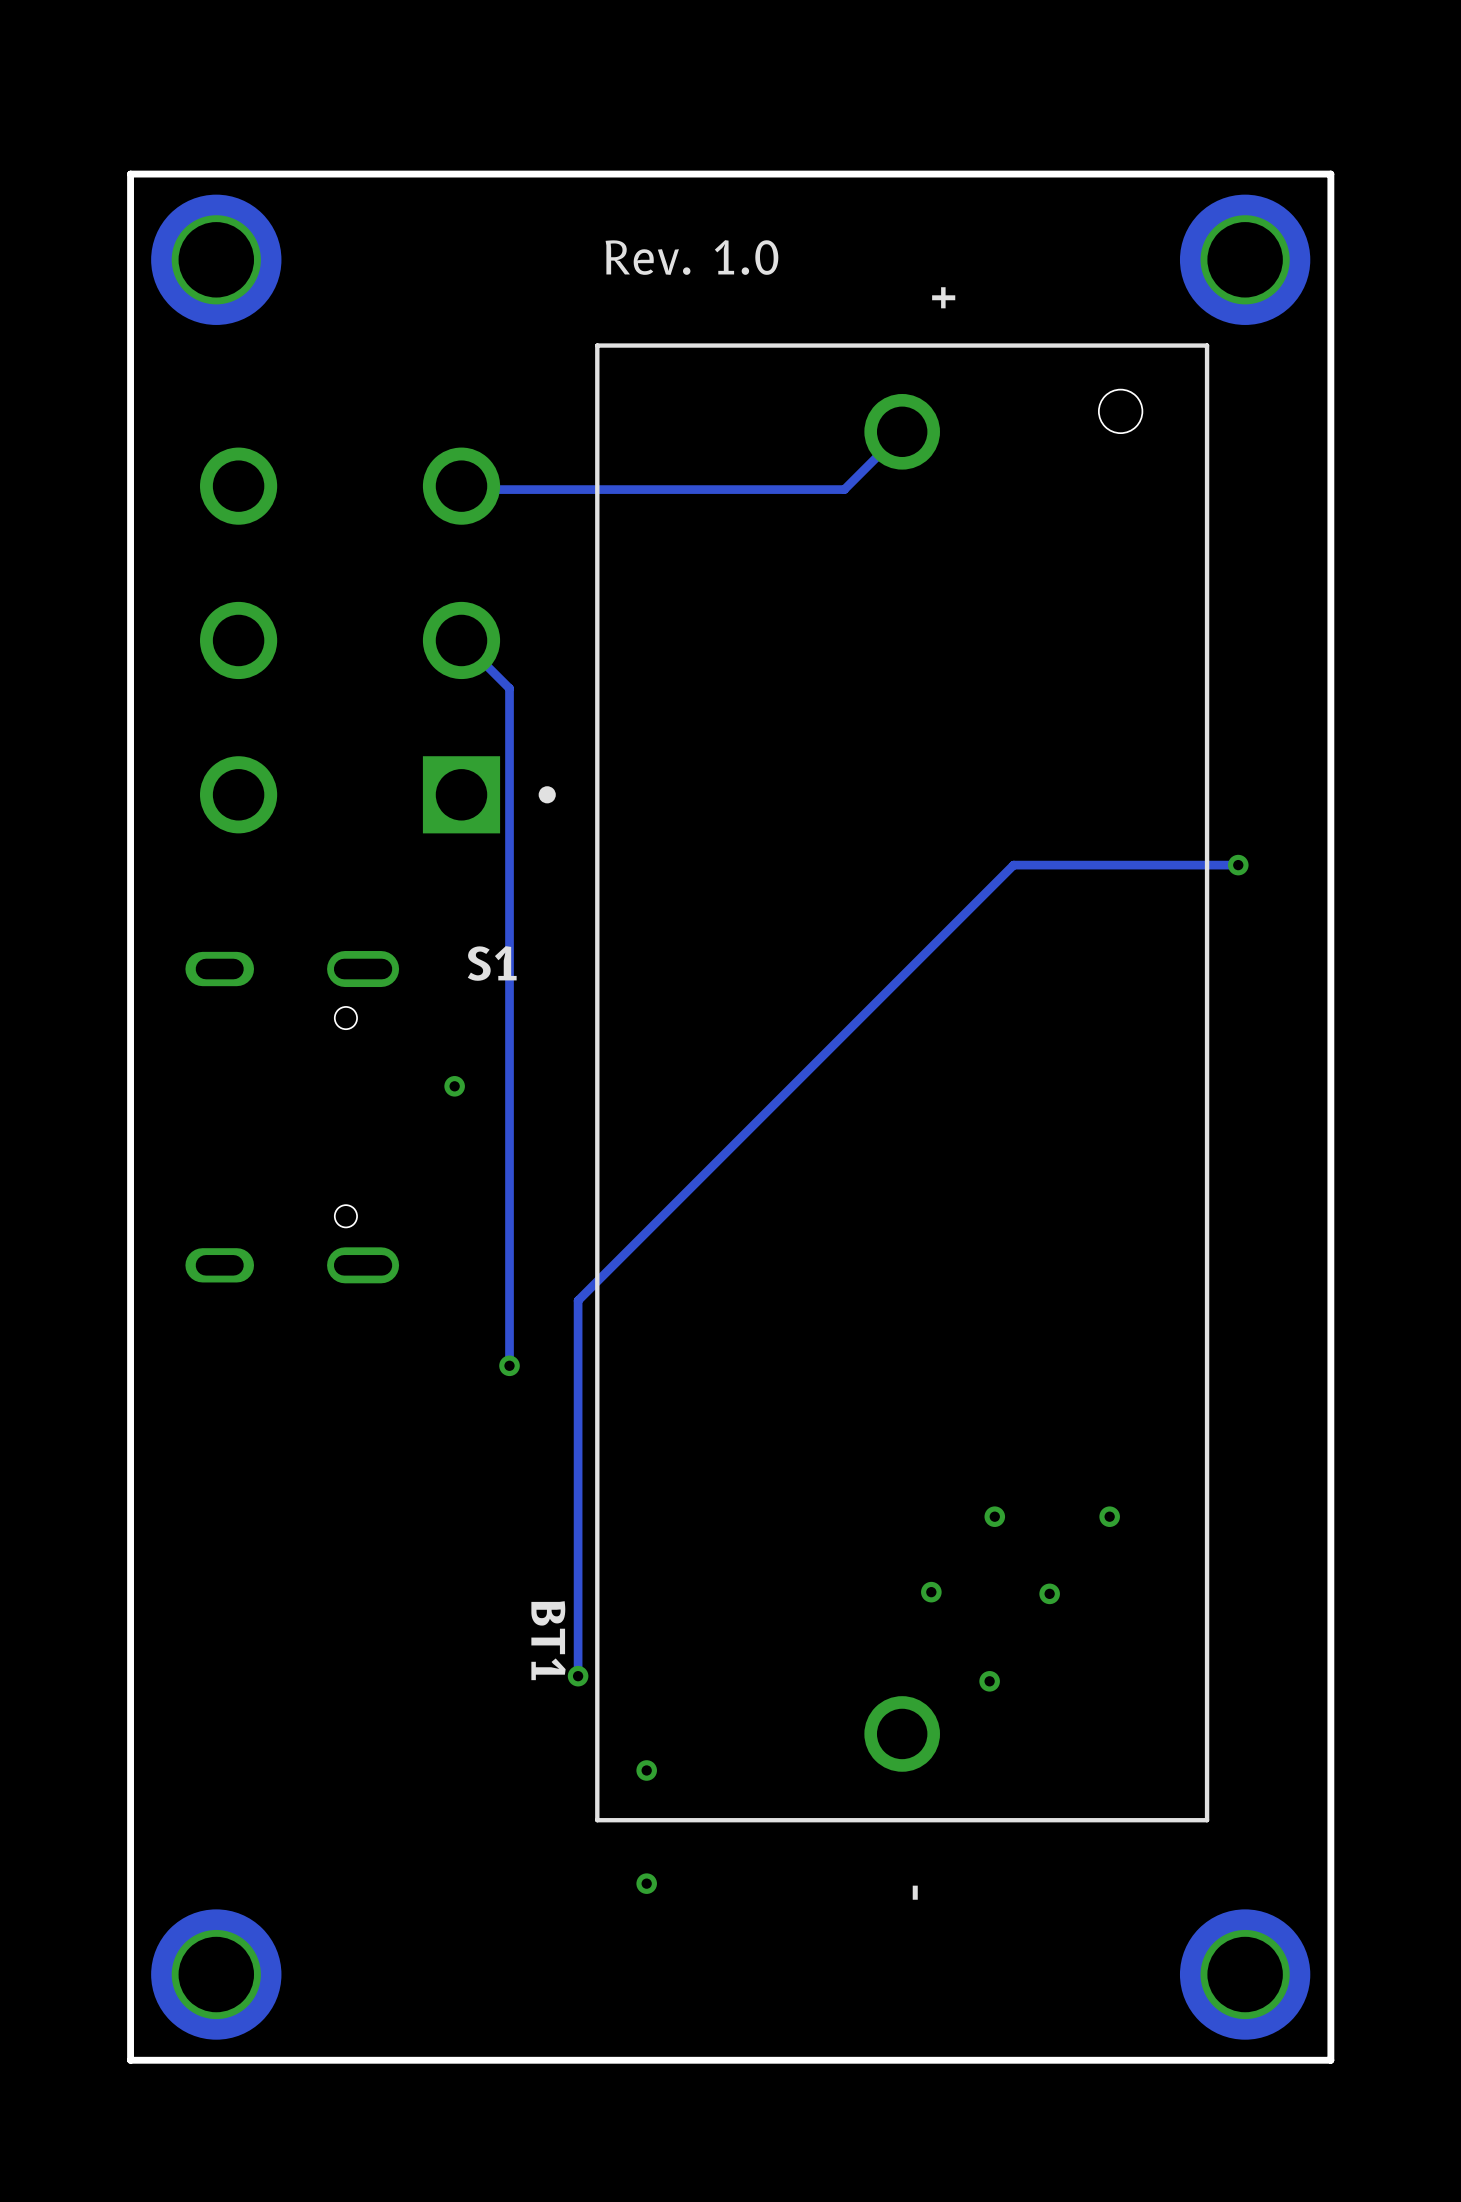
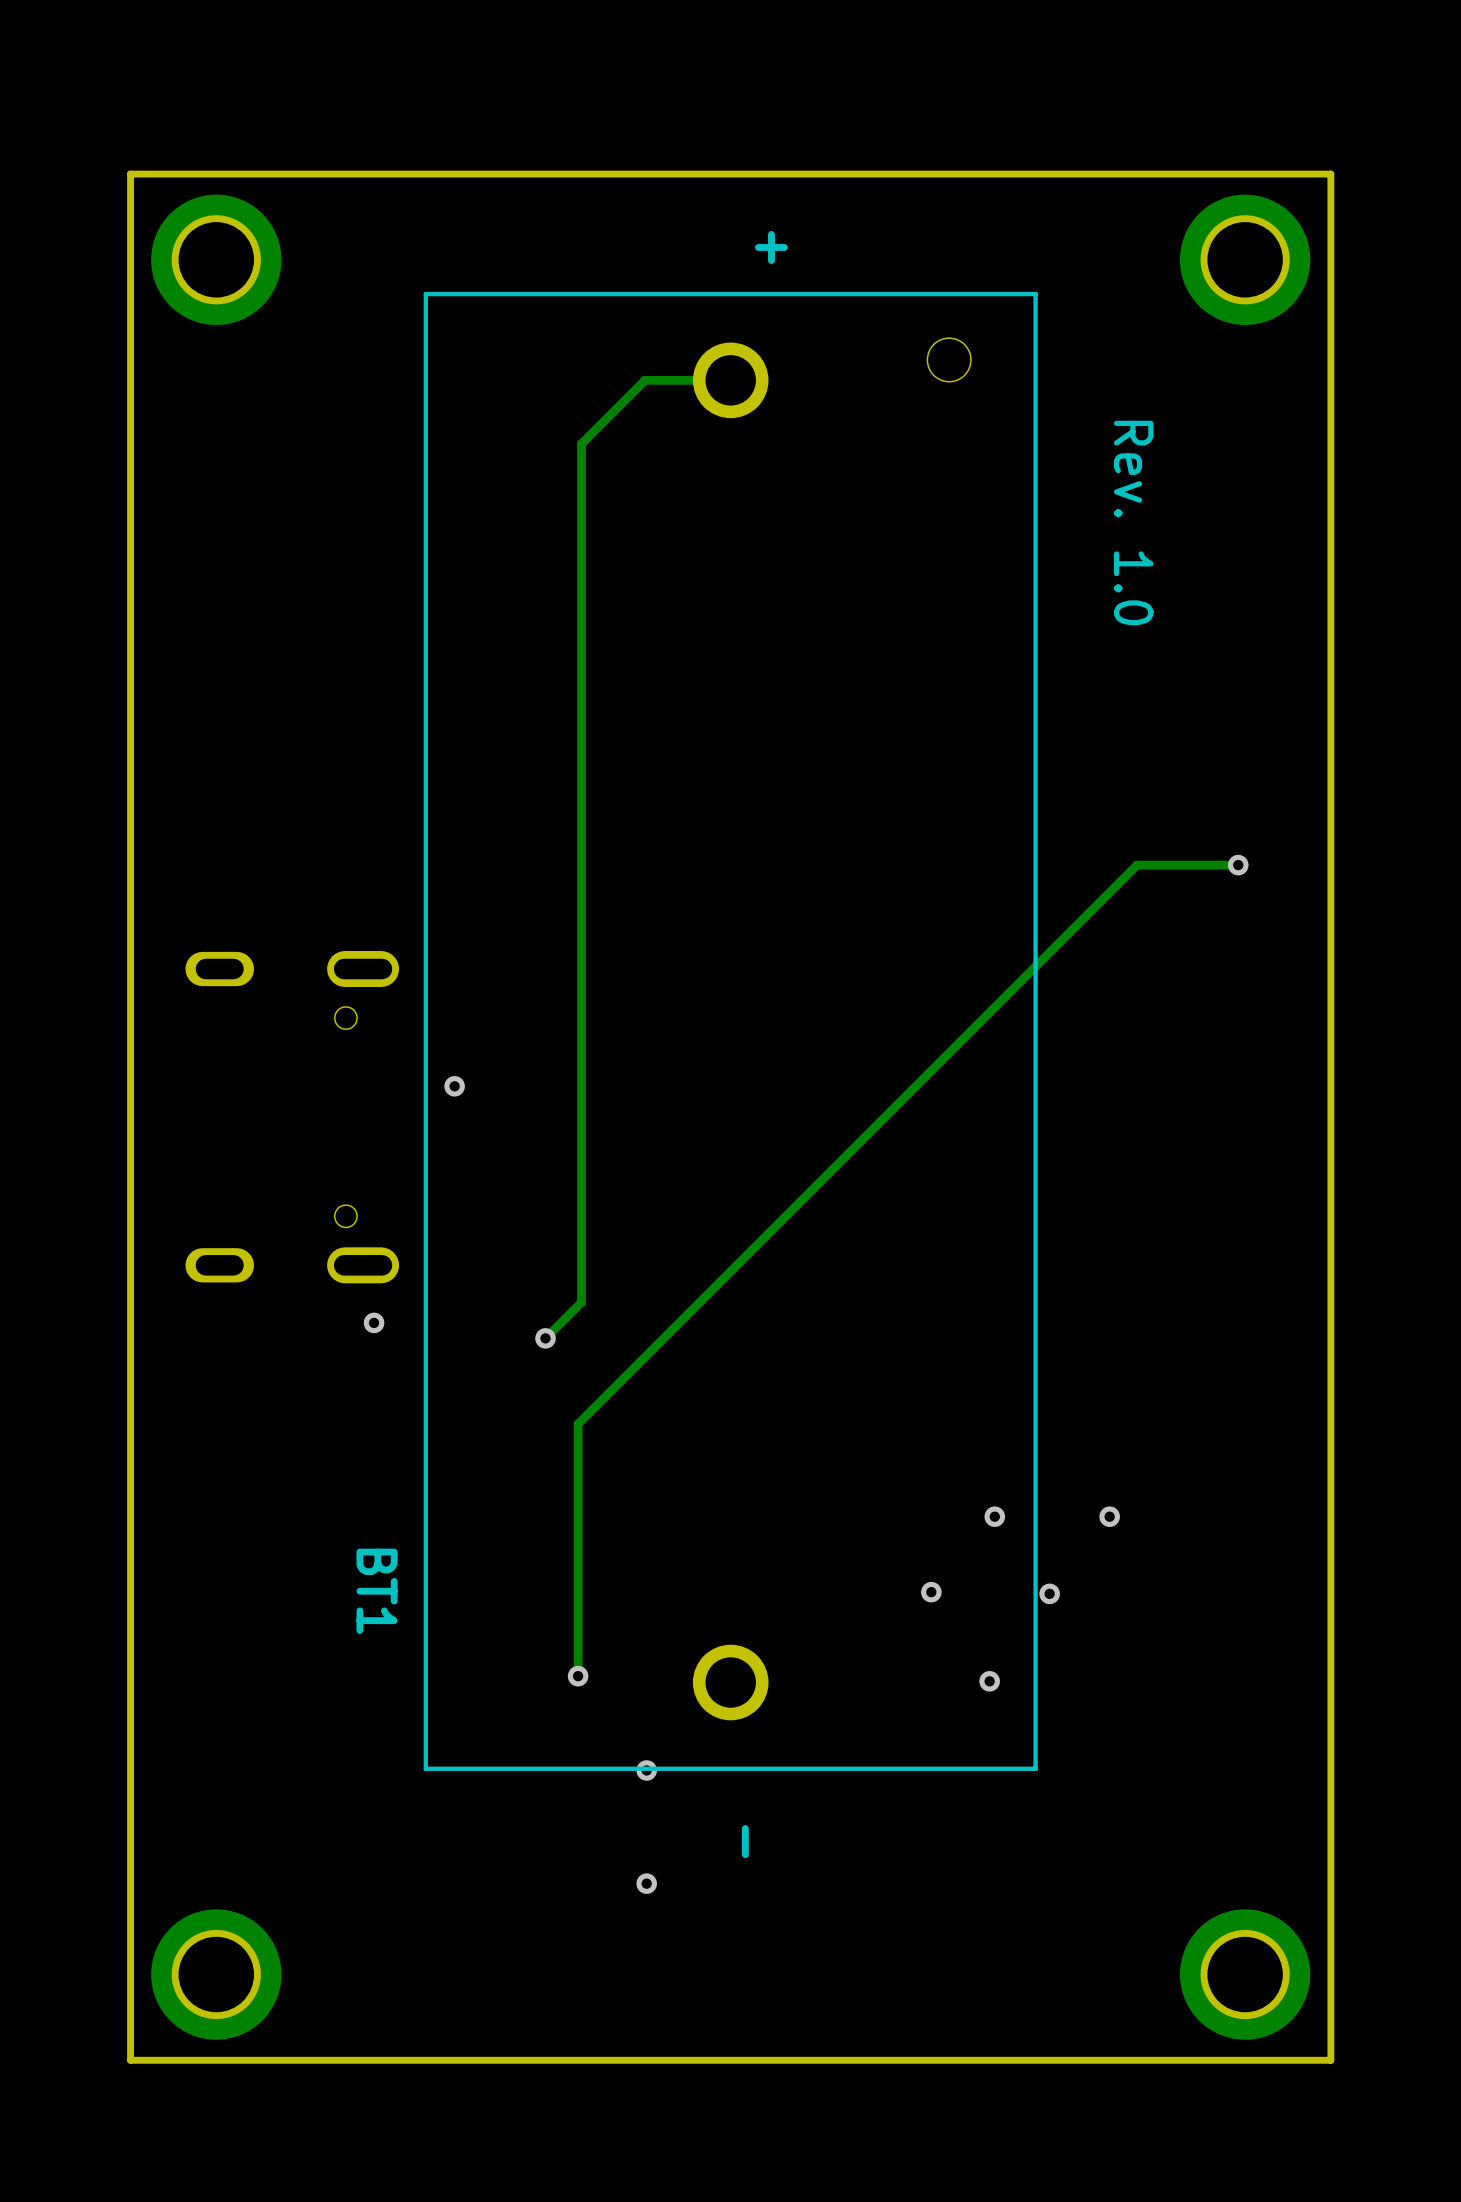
text rotation: 0° (691, 257) -> 90° clockwise (1133, 522)
text position: Rev. 1.0 (691, 257) -> Rev. 1.0 (1133, 522)
track: none -> (730, 380) (644, 380) (581, 443) (581, 1302) (545, 1338)
track: (902, 431) (844, 489) (464, 489) (461, 486) -> none
S1: (377, 640) -> none
track: (461, 640) (509, 688) (509, 1365) -> none
track: (1137, 865) (1013, 865) (578, 1300) (578, 1424) -> (1137, 865) (578, 1424)
BT1 position: (902, 1082) -> (730, 1031)
via: none -> (374, 1322)
via position: (509, 1365) -> (545, 1338)

